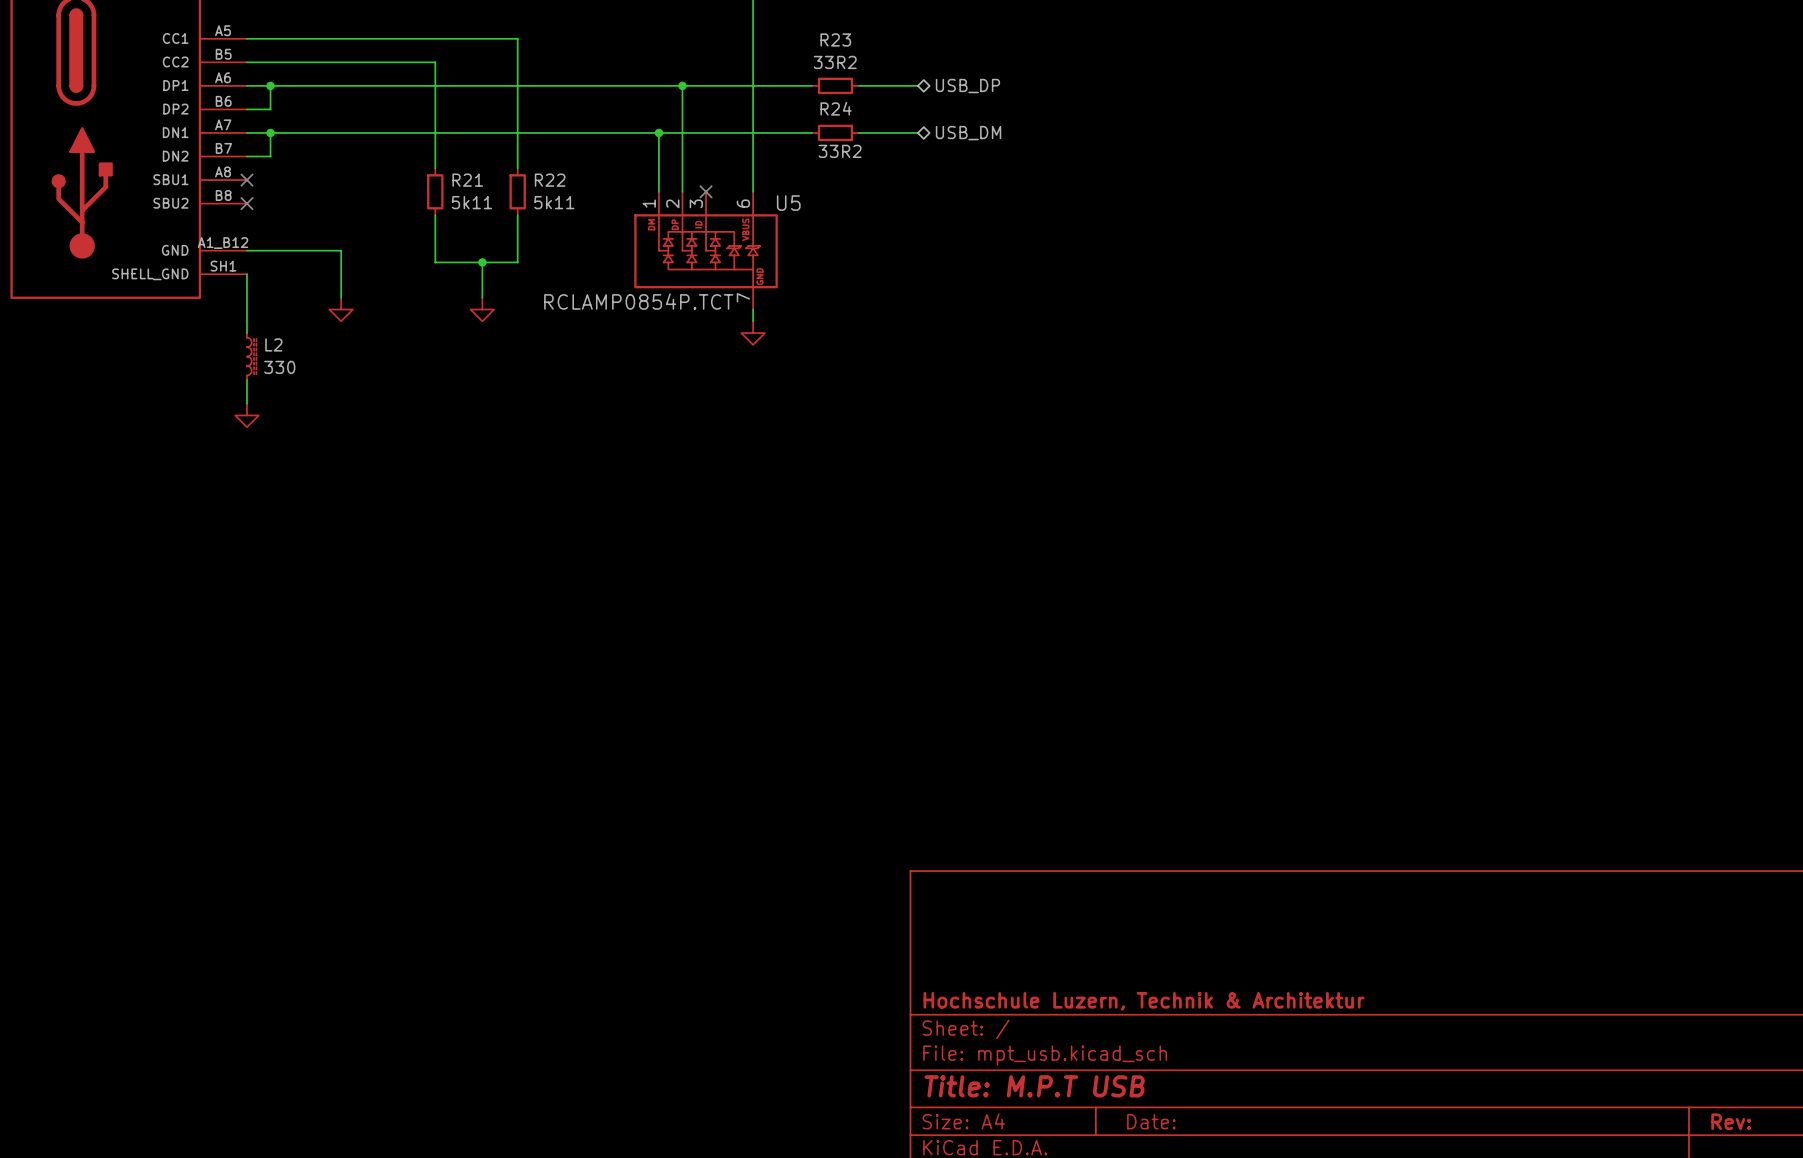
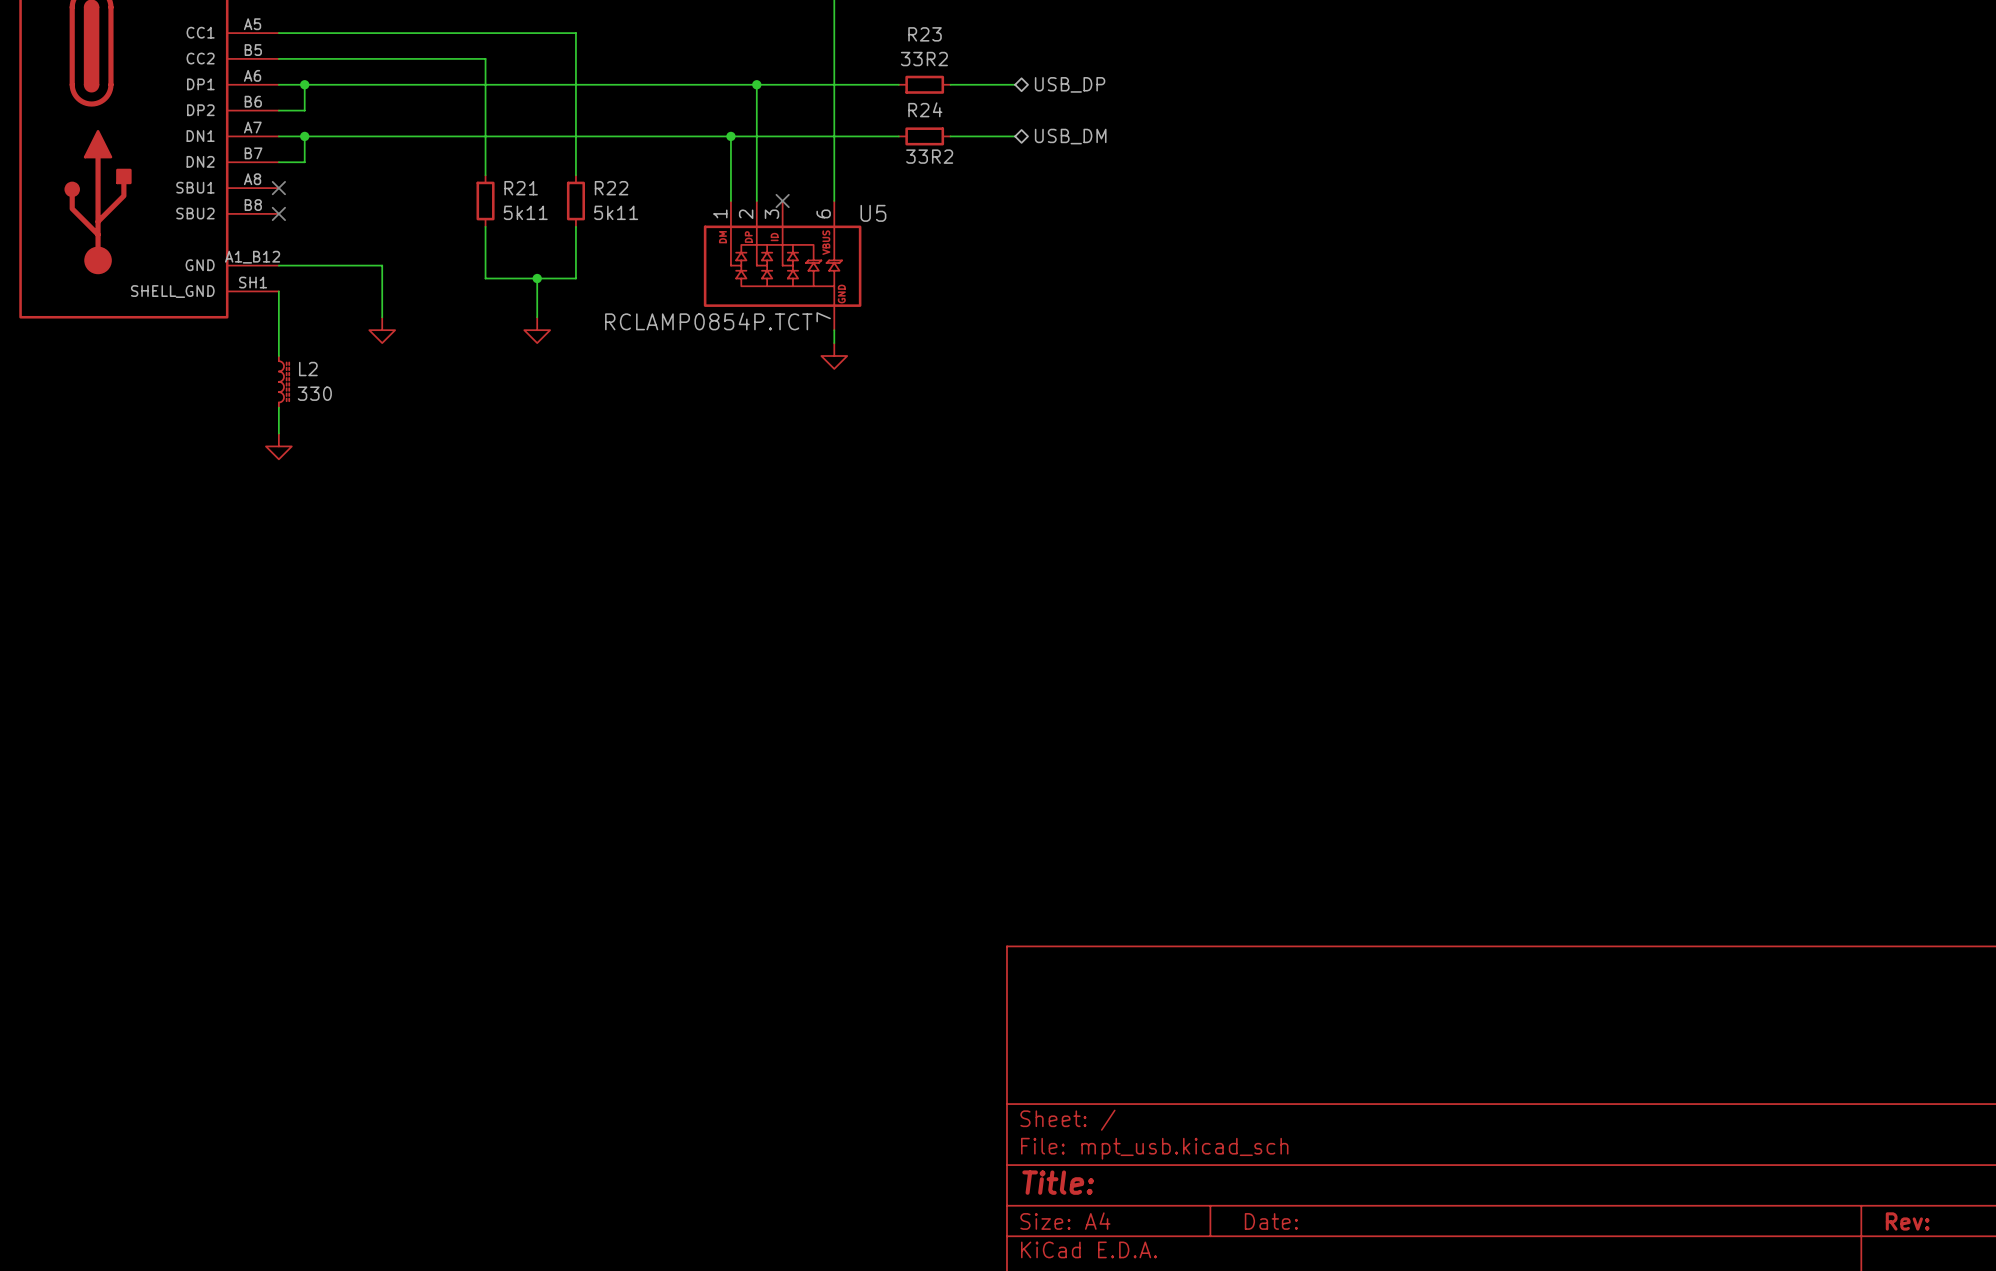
title block: Hochschule Luzern, Technik & Architektur (1144, 1001) -> none
title block: Title: M.P.T USB (1034, 1086) -> Title: (1058, 1182)

